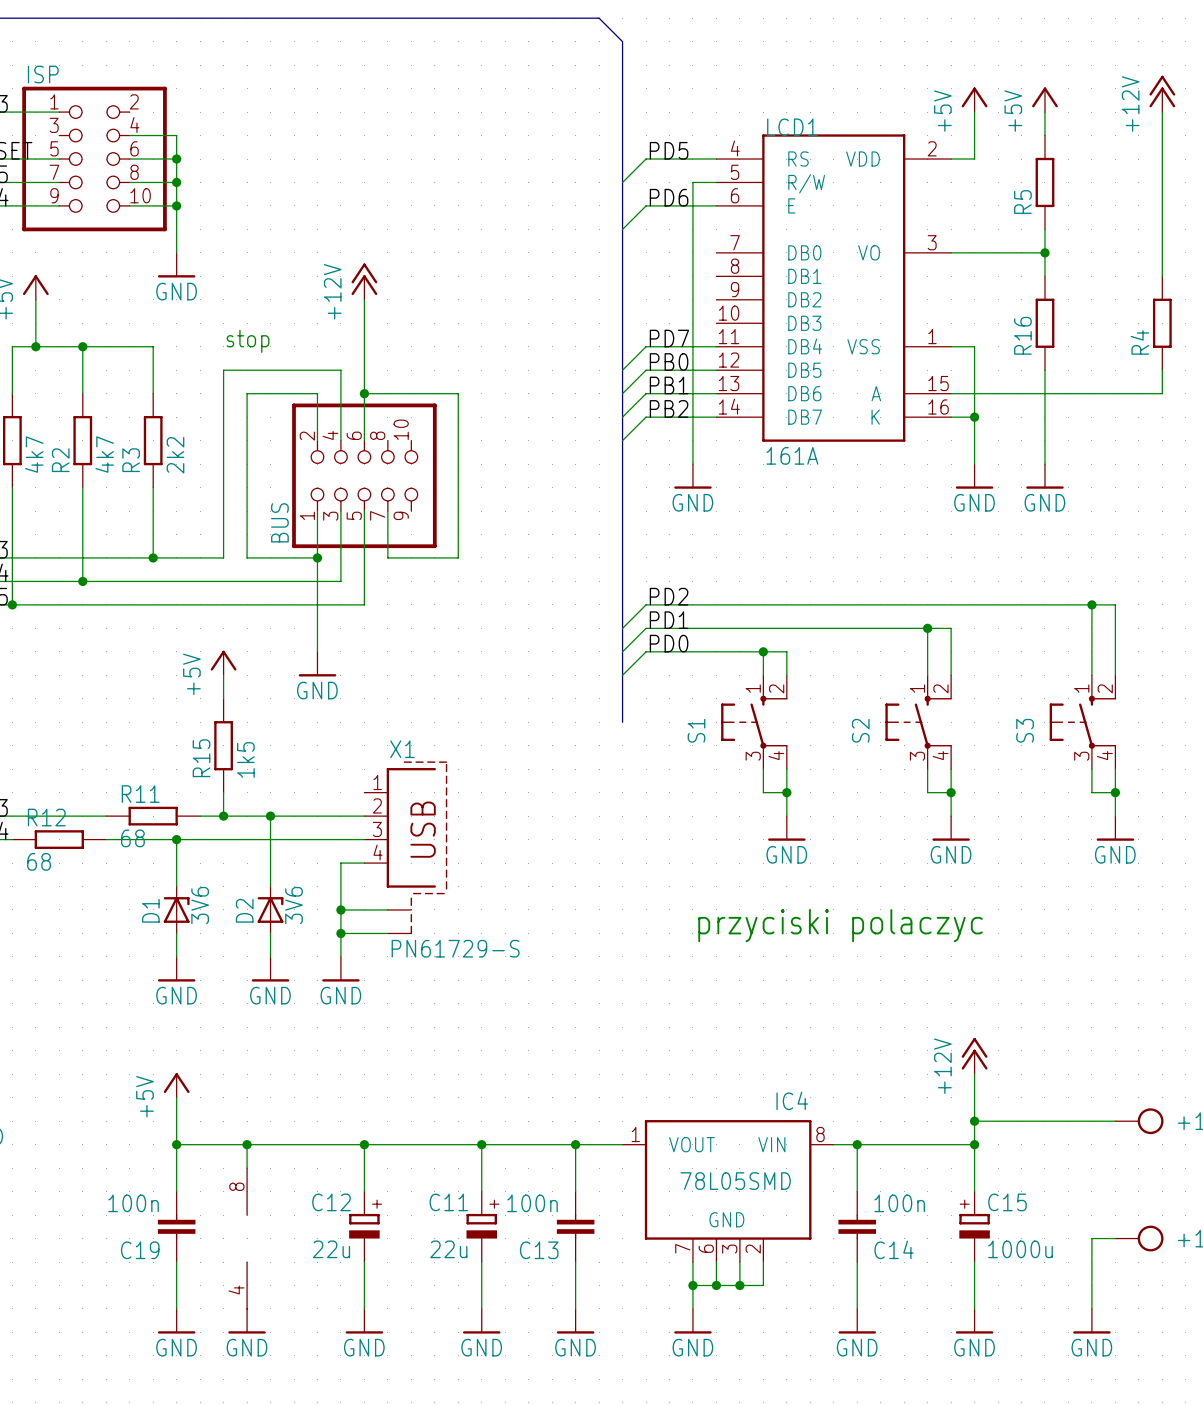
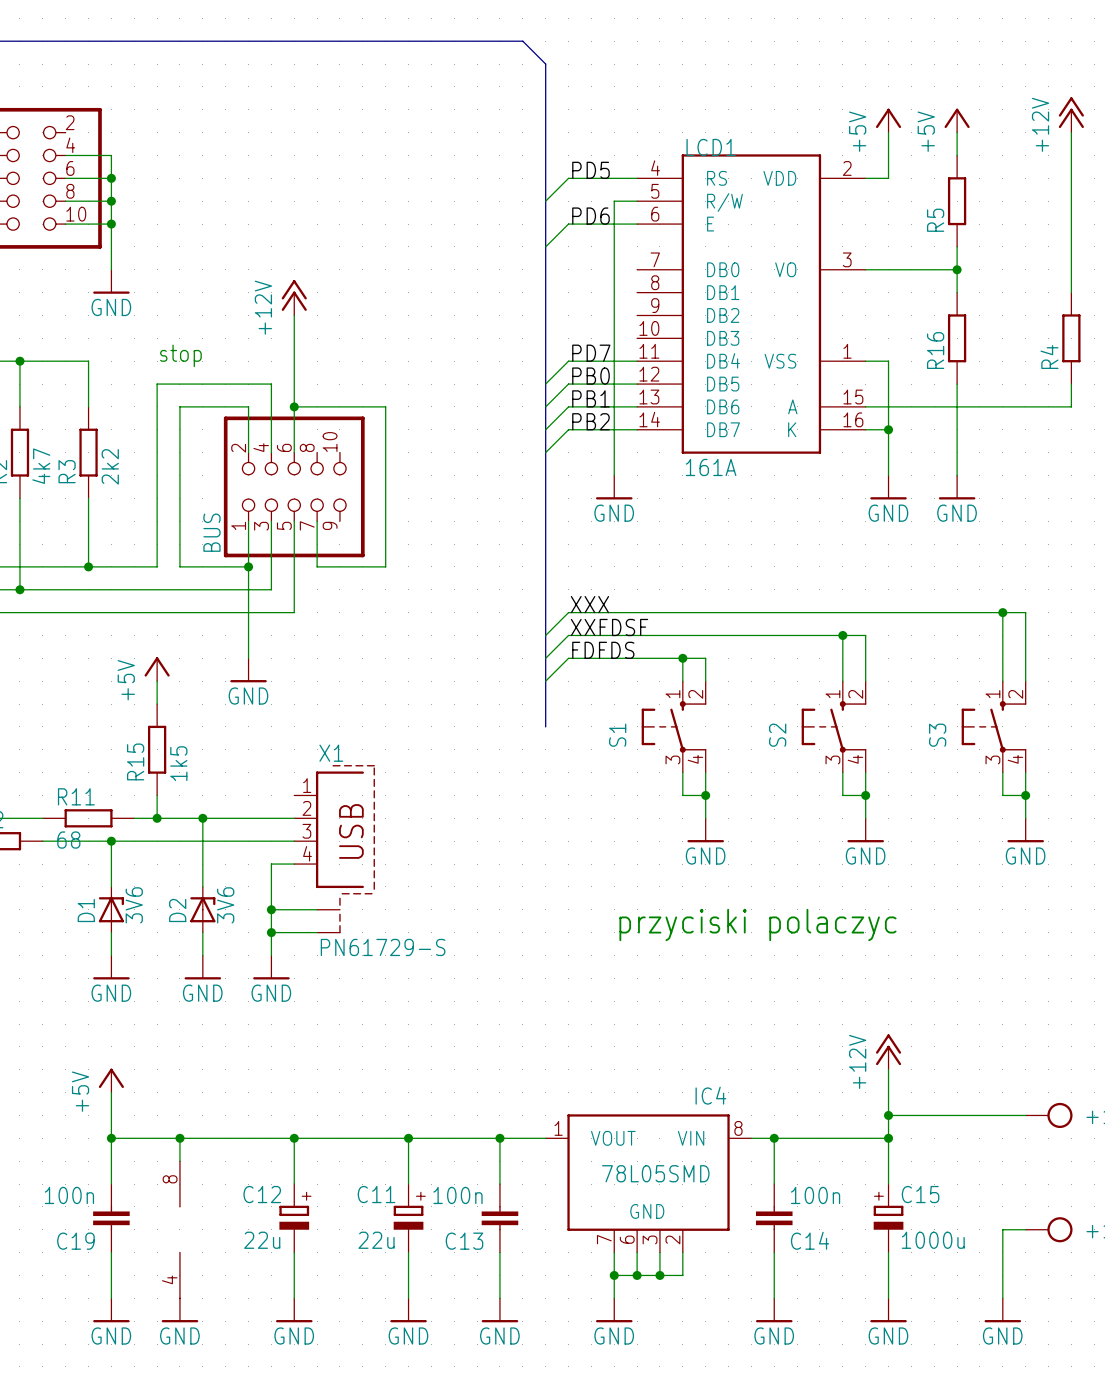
label: PD2 (669, 596) -> XXX (589, 604)
label: PD1 (669, 620) -> XXFDSF (609, 627)
label: PD0 (669, 643) -> FDFDS (603, 650)

